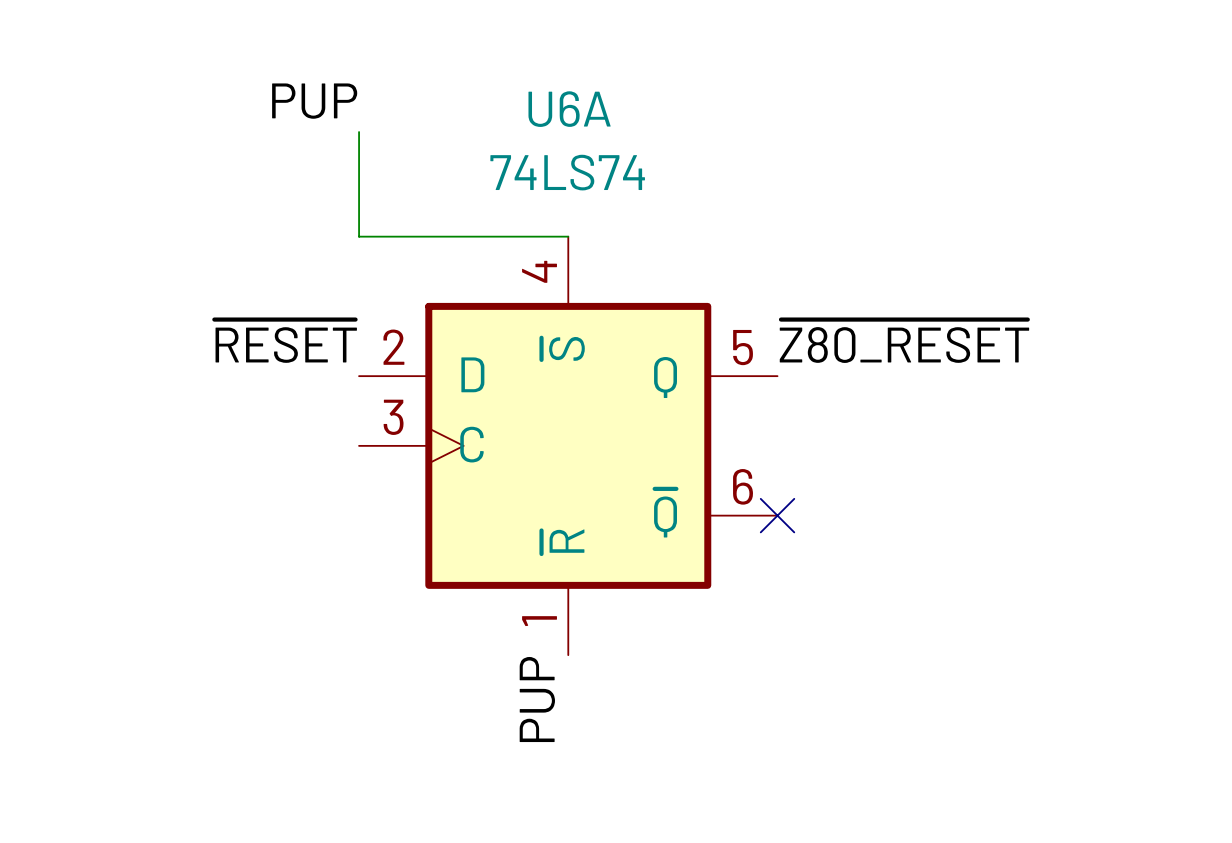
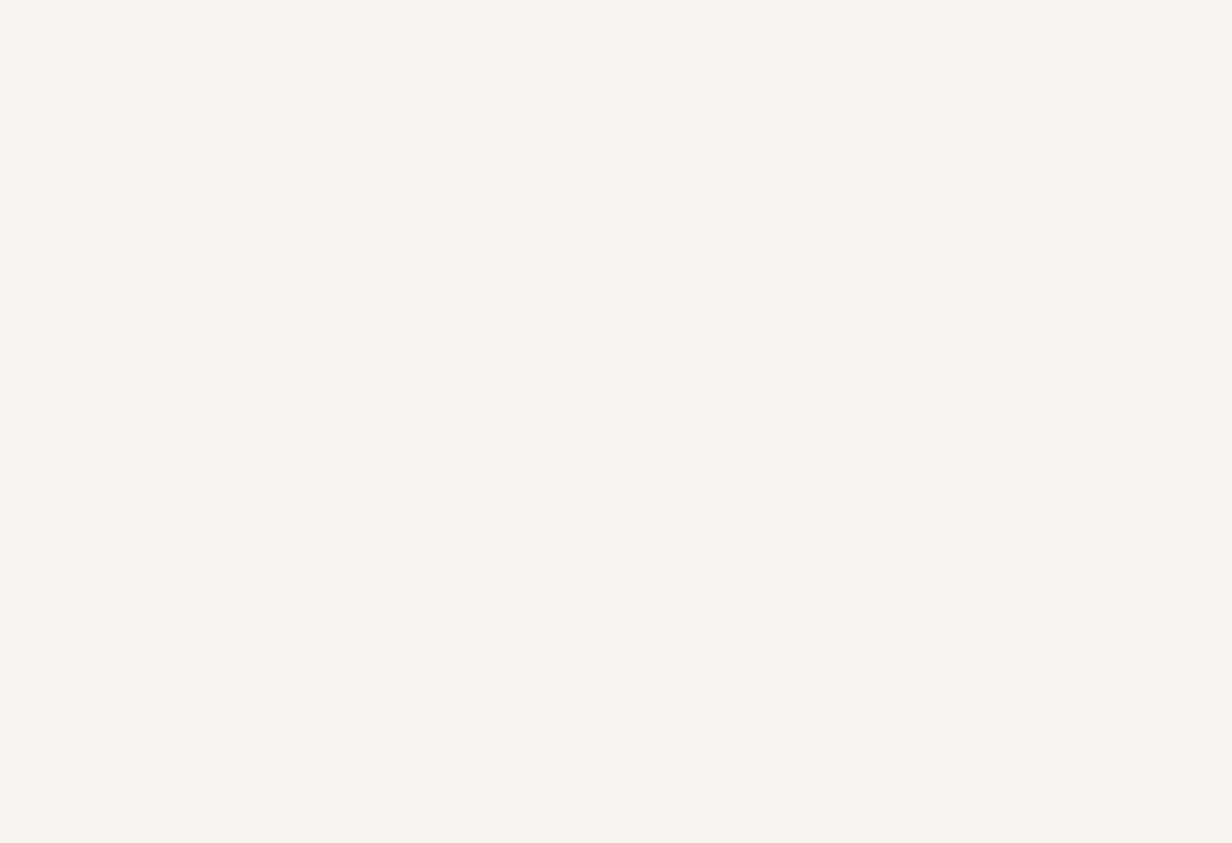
label: PUP (314, 101) -> none
wire: (359, 132) (359, 236) (568, 236) -> none
label: ~{RESET} (285, 341) -> none
label: ~{Z80_RESET} (904, 341) -> none
U6A: 74LS74 (568, 445) -> none
no-connect mark: (777, 515) -> none
label: PUP (537, 699) -> none

